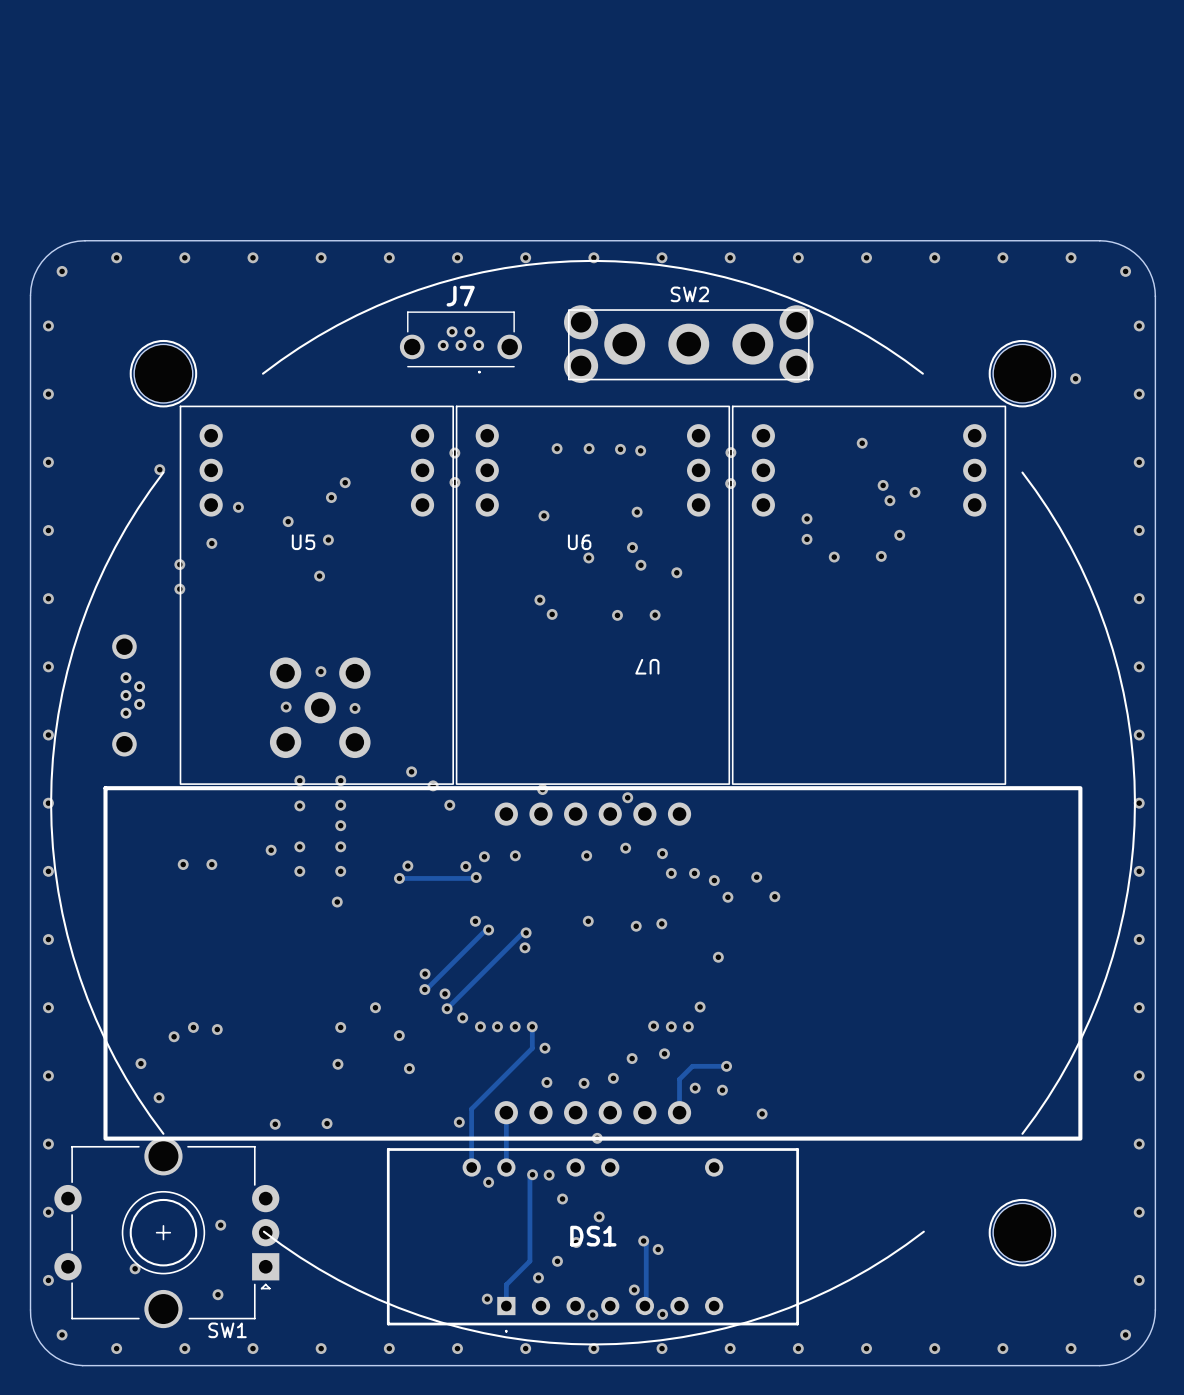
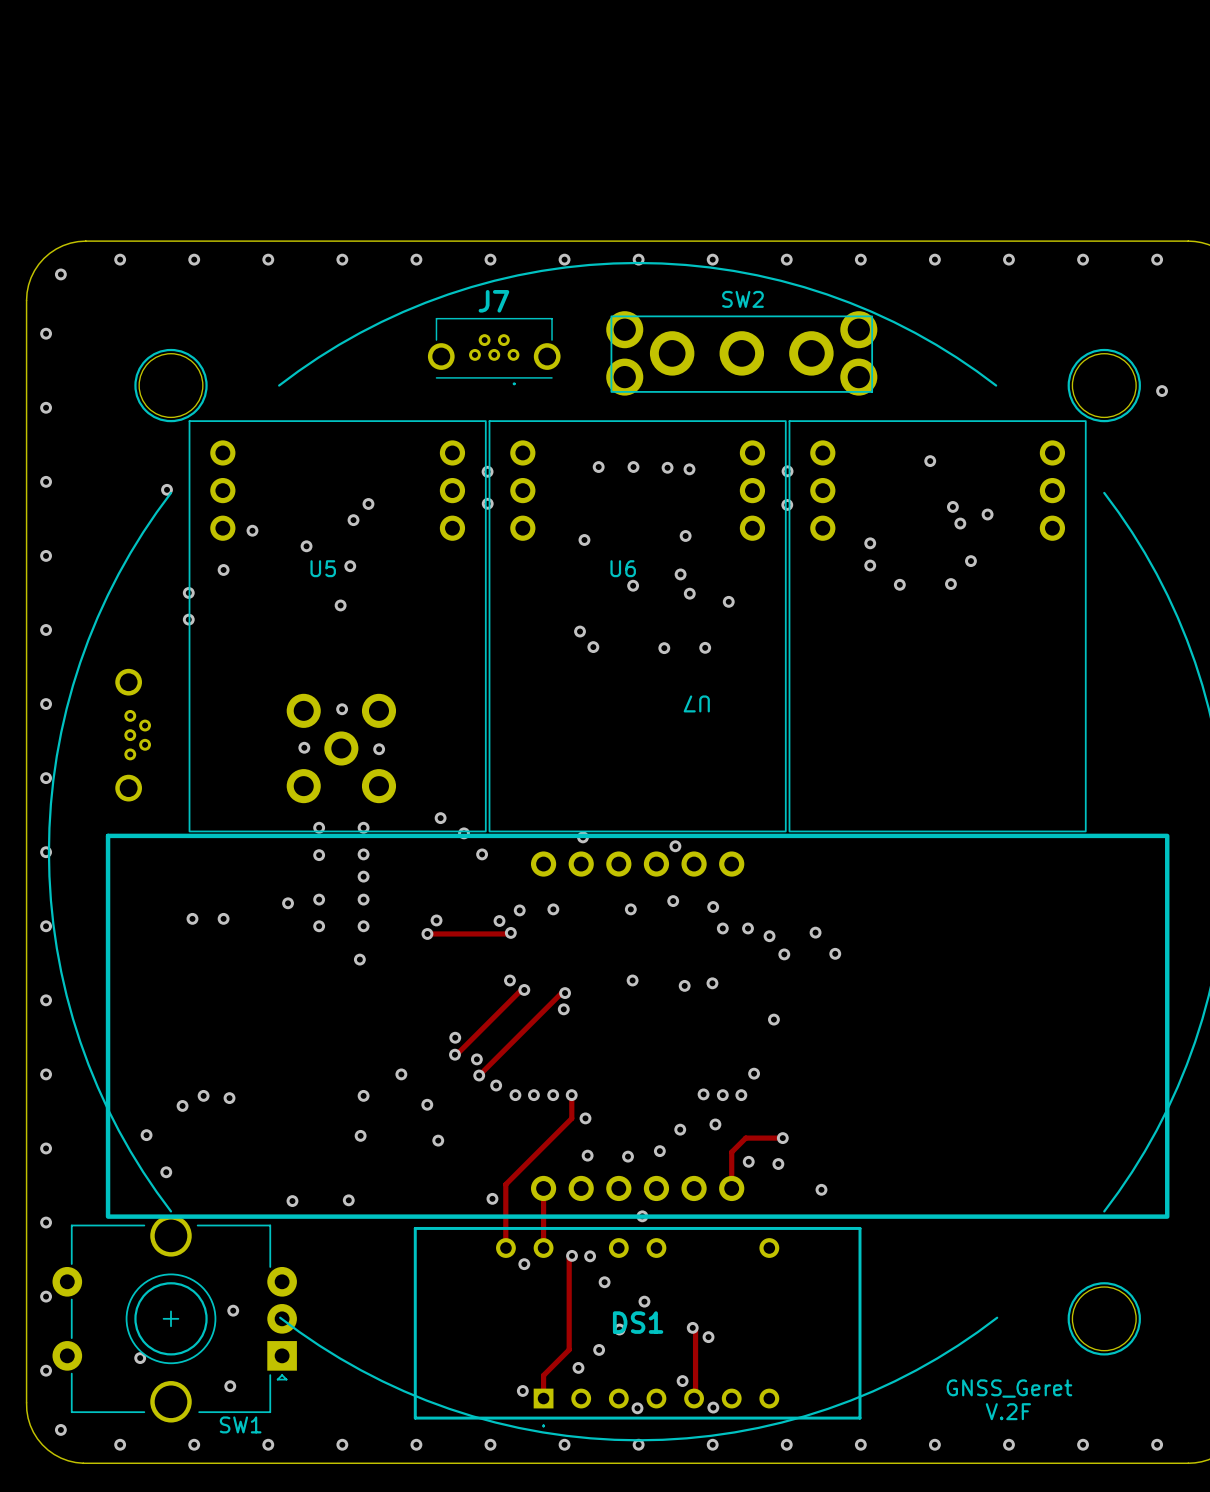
text: none -> GNSS_Geret (1009, 1388)
text: none -> V.2F (1008, 1411)

